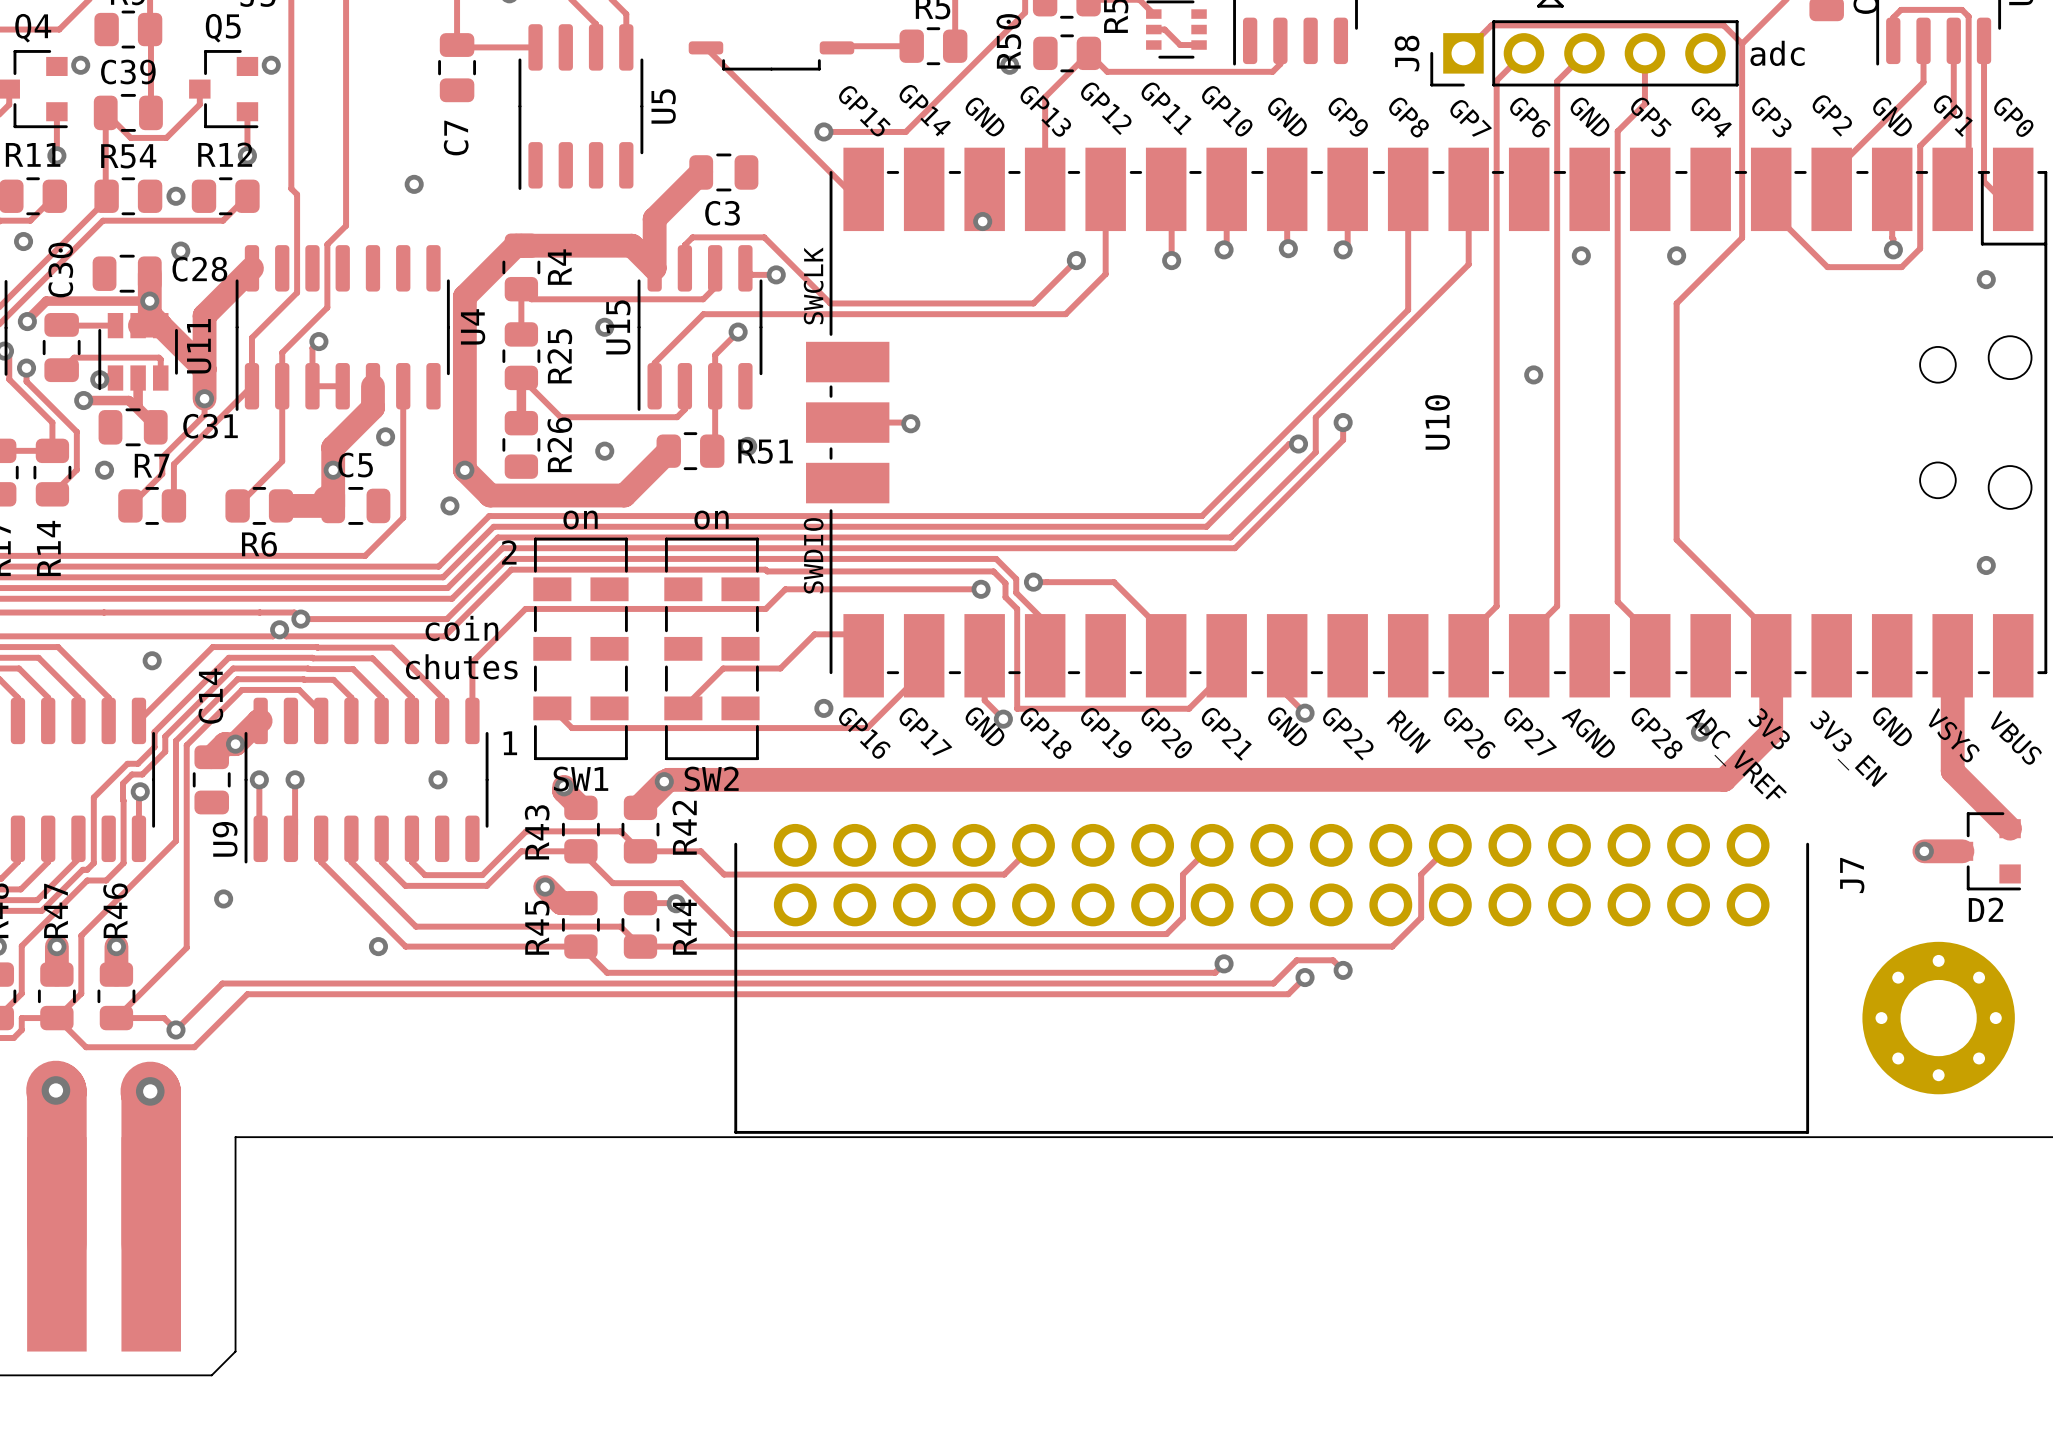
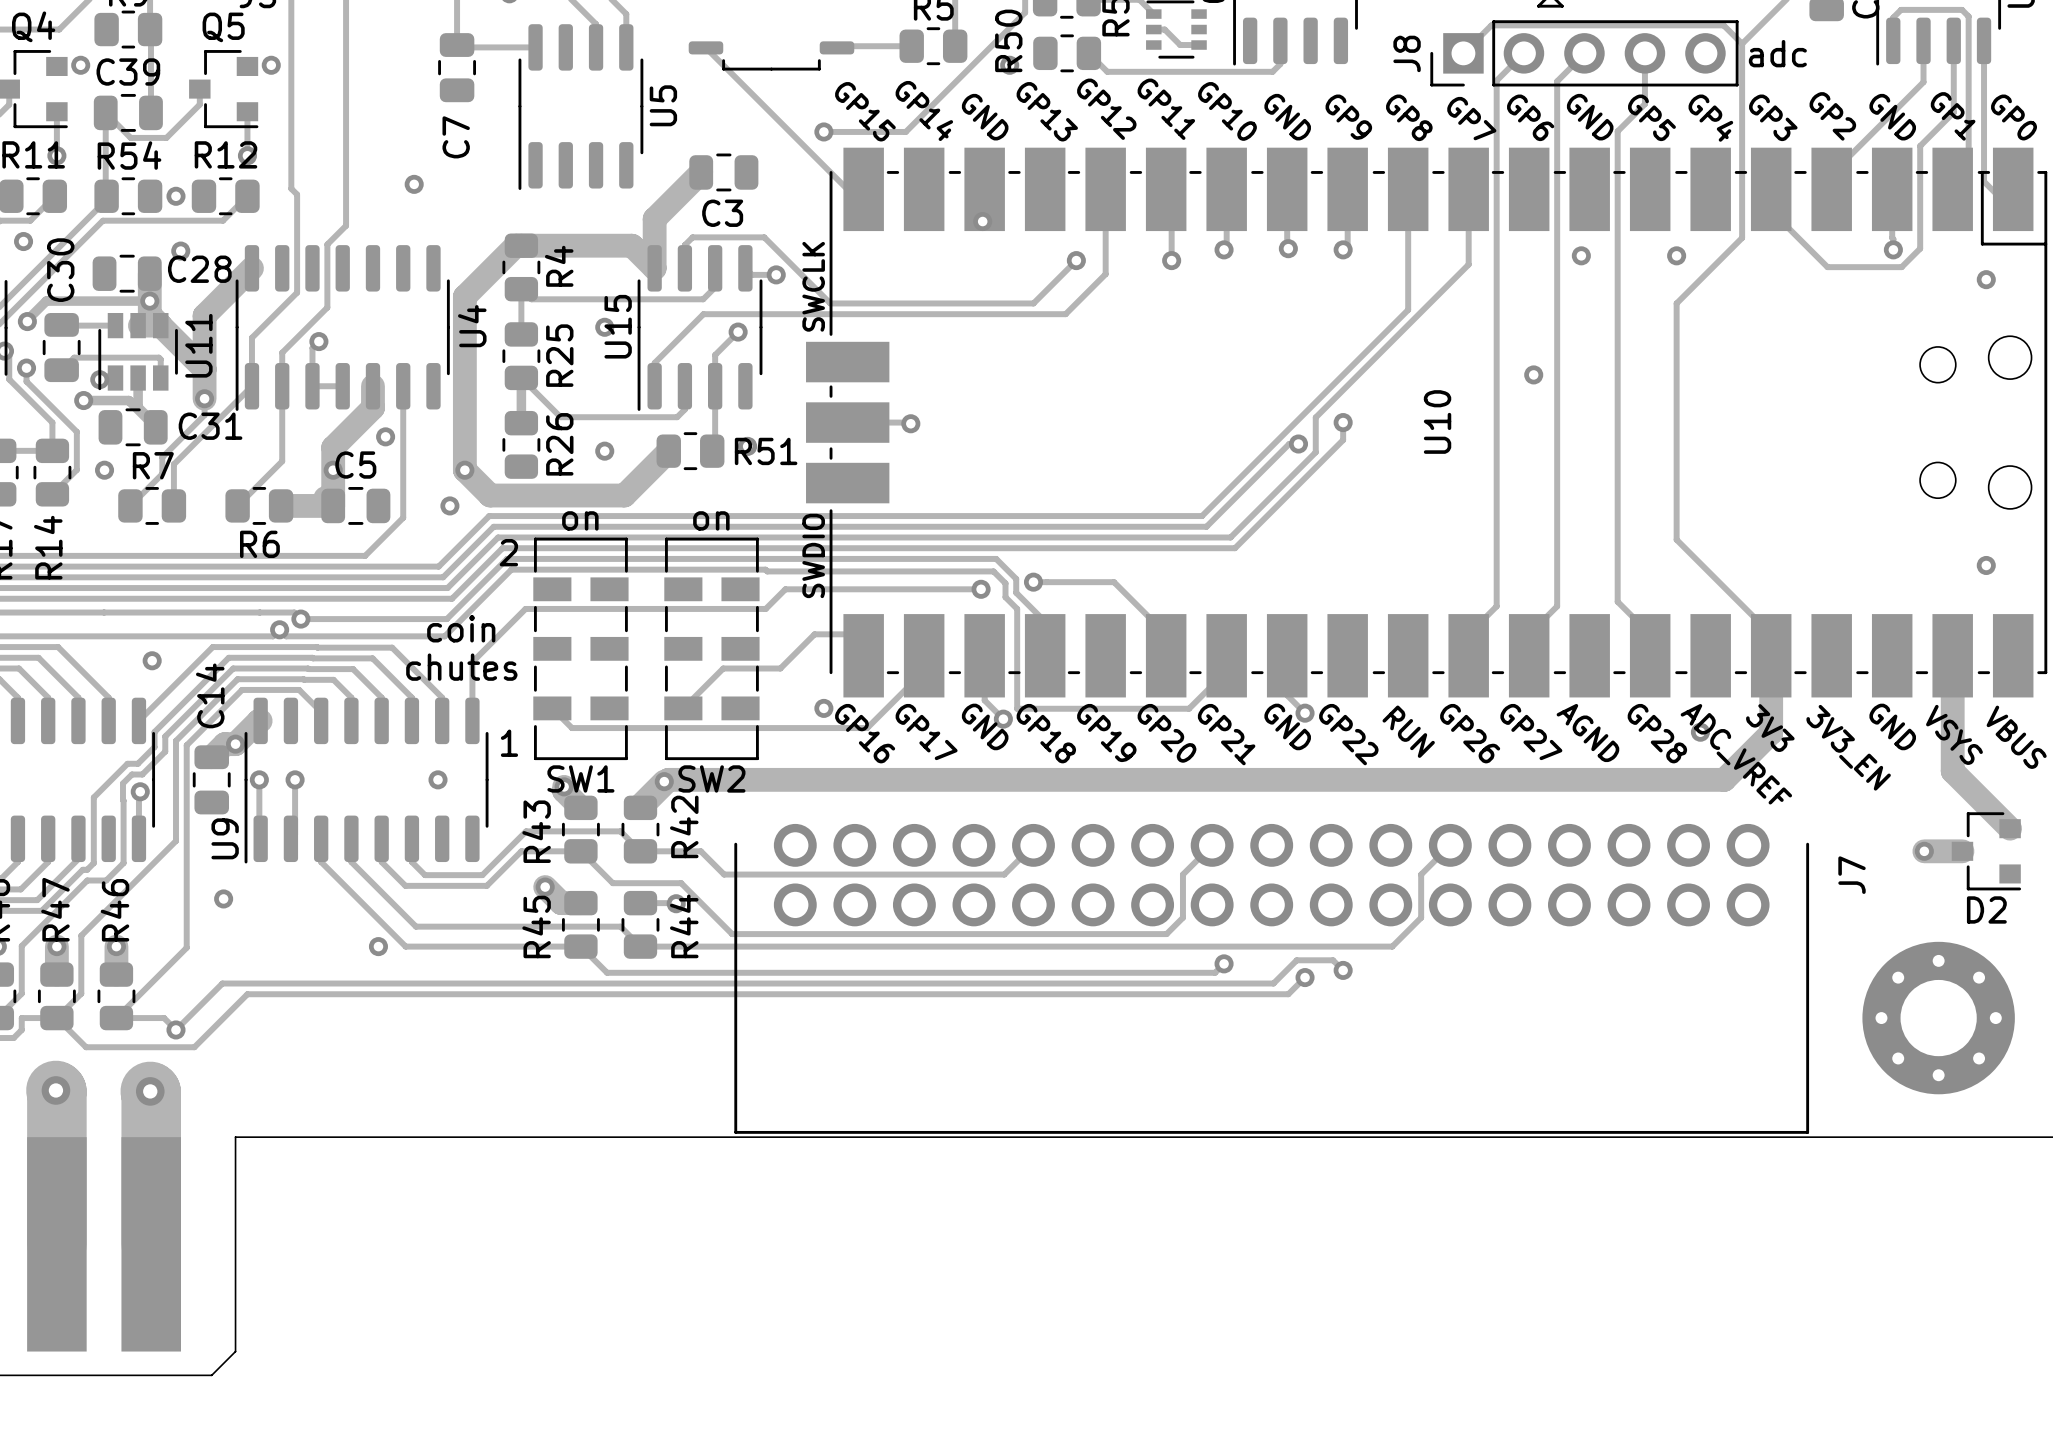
track: (1088, 53) (1045, 97) (1045, 210) -> none

